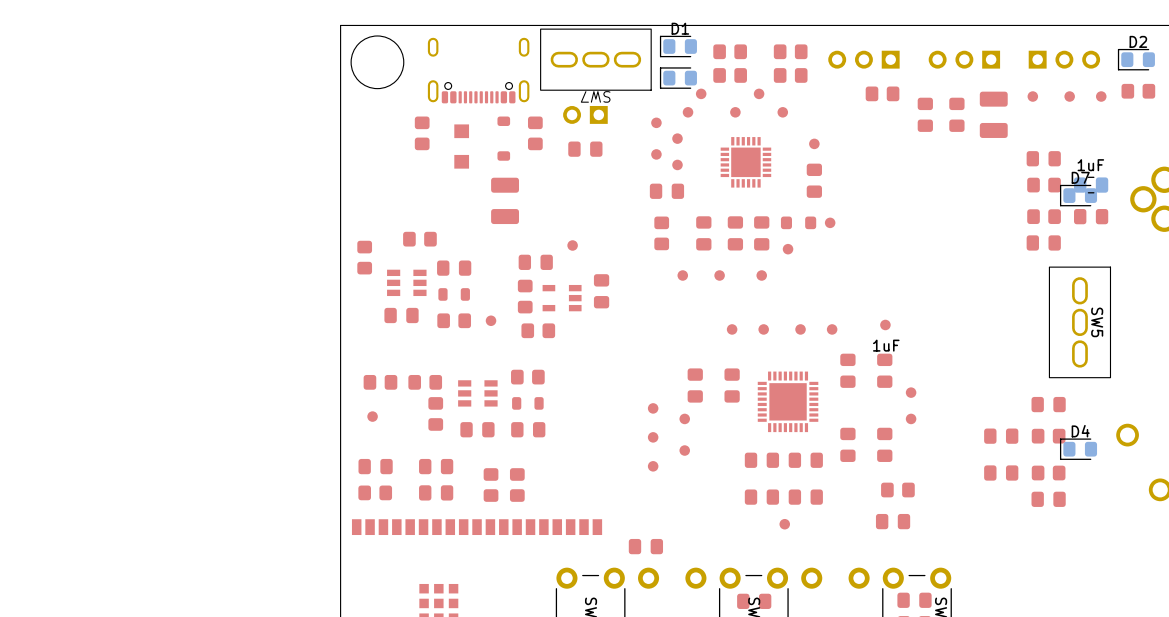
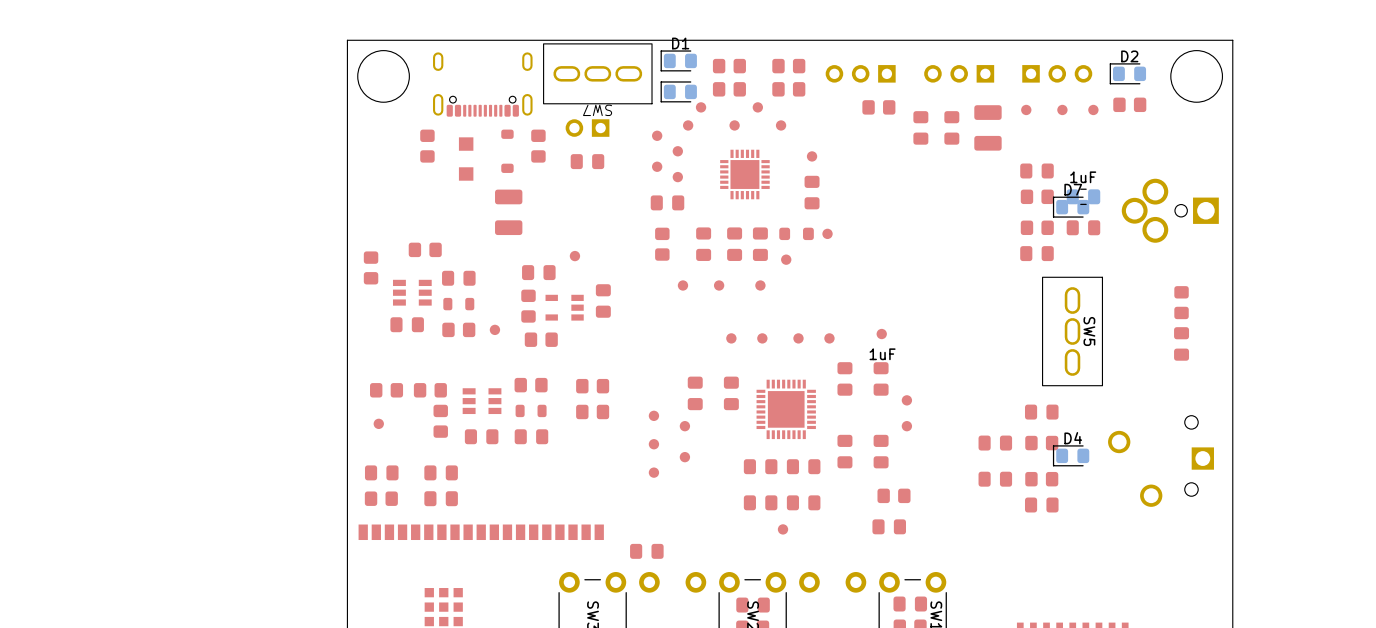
part: none -> (592, 386)
part: none -> (592, 411)
part: (491, 485) -> none
part: (517, 485) -> none

